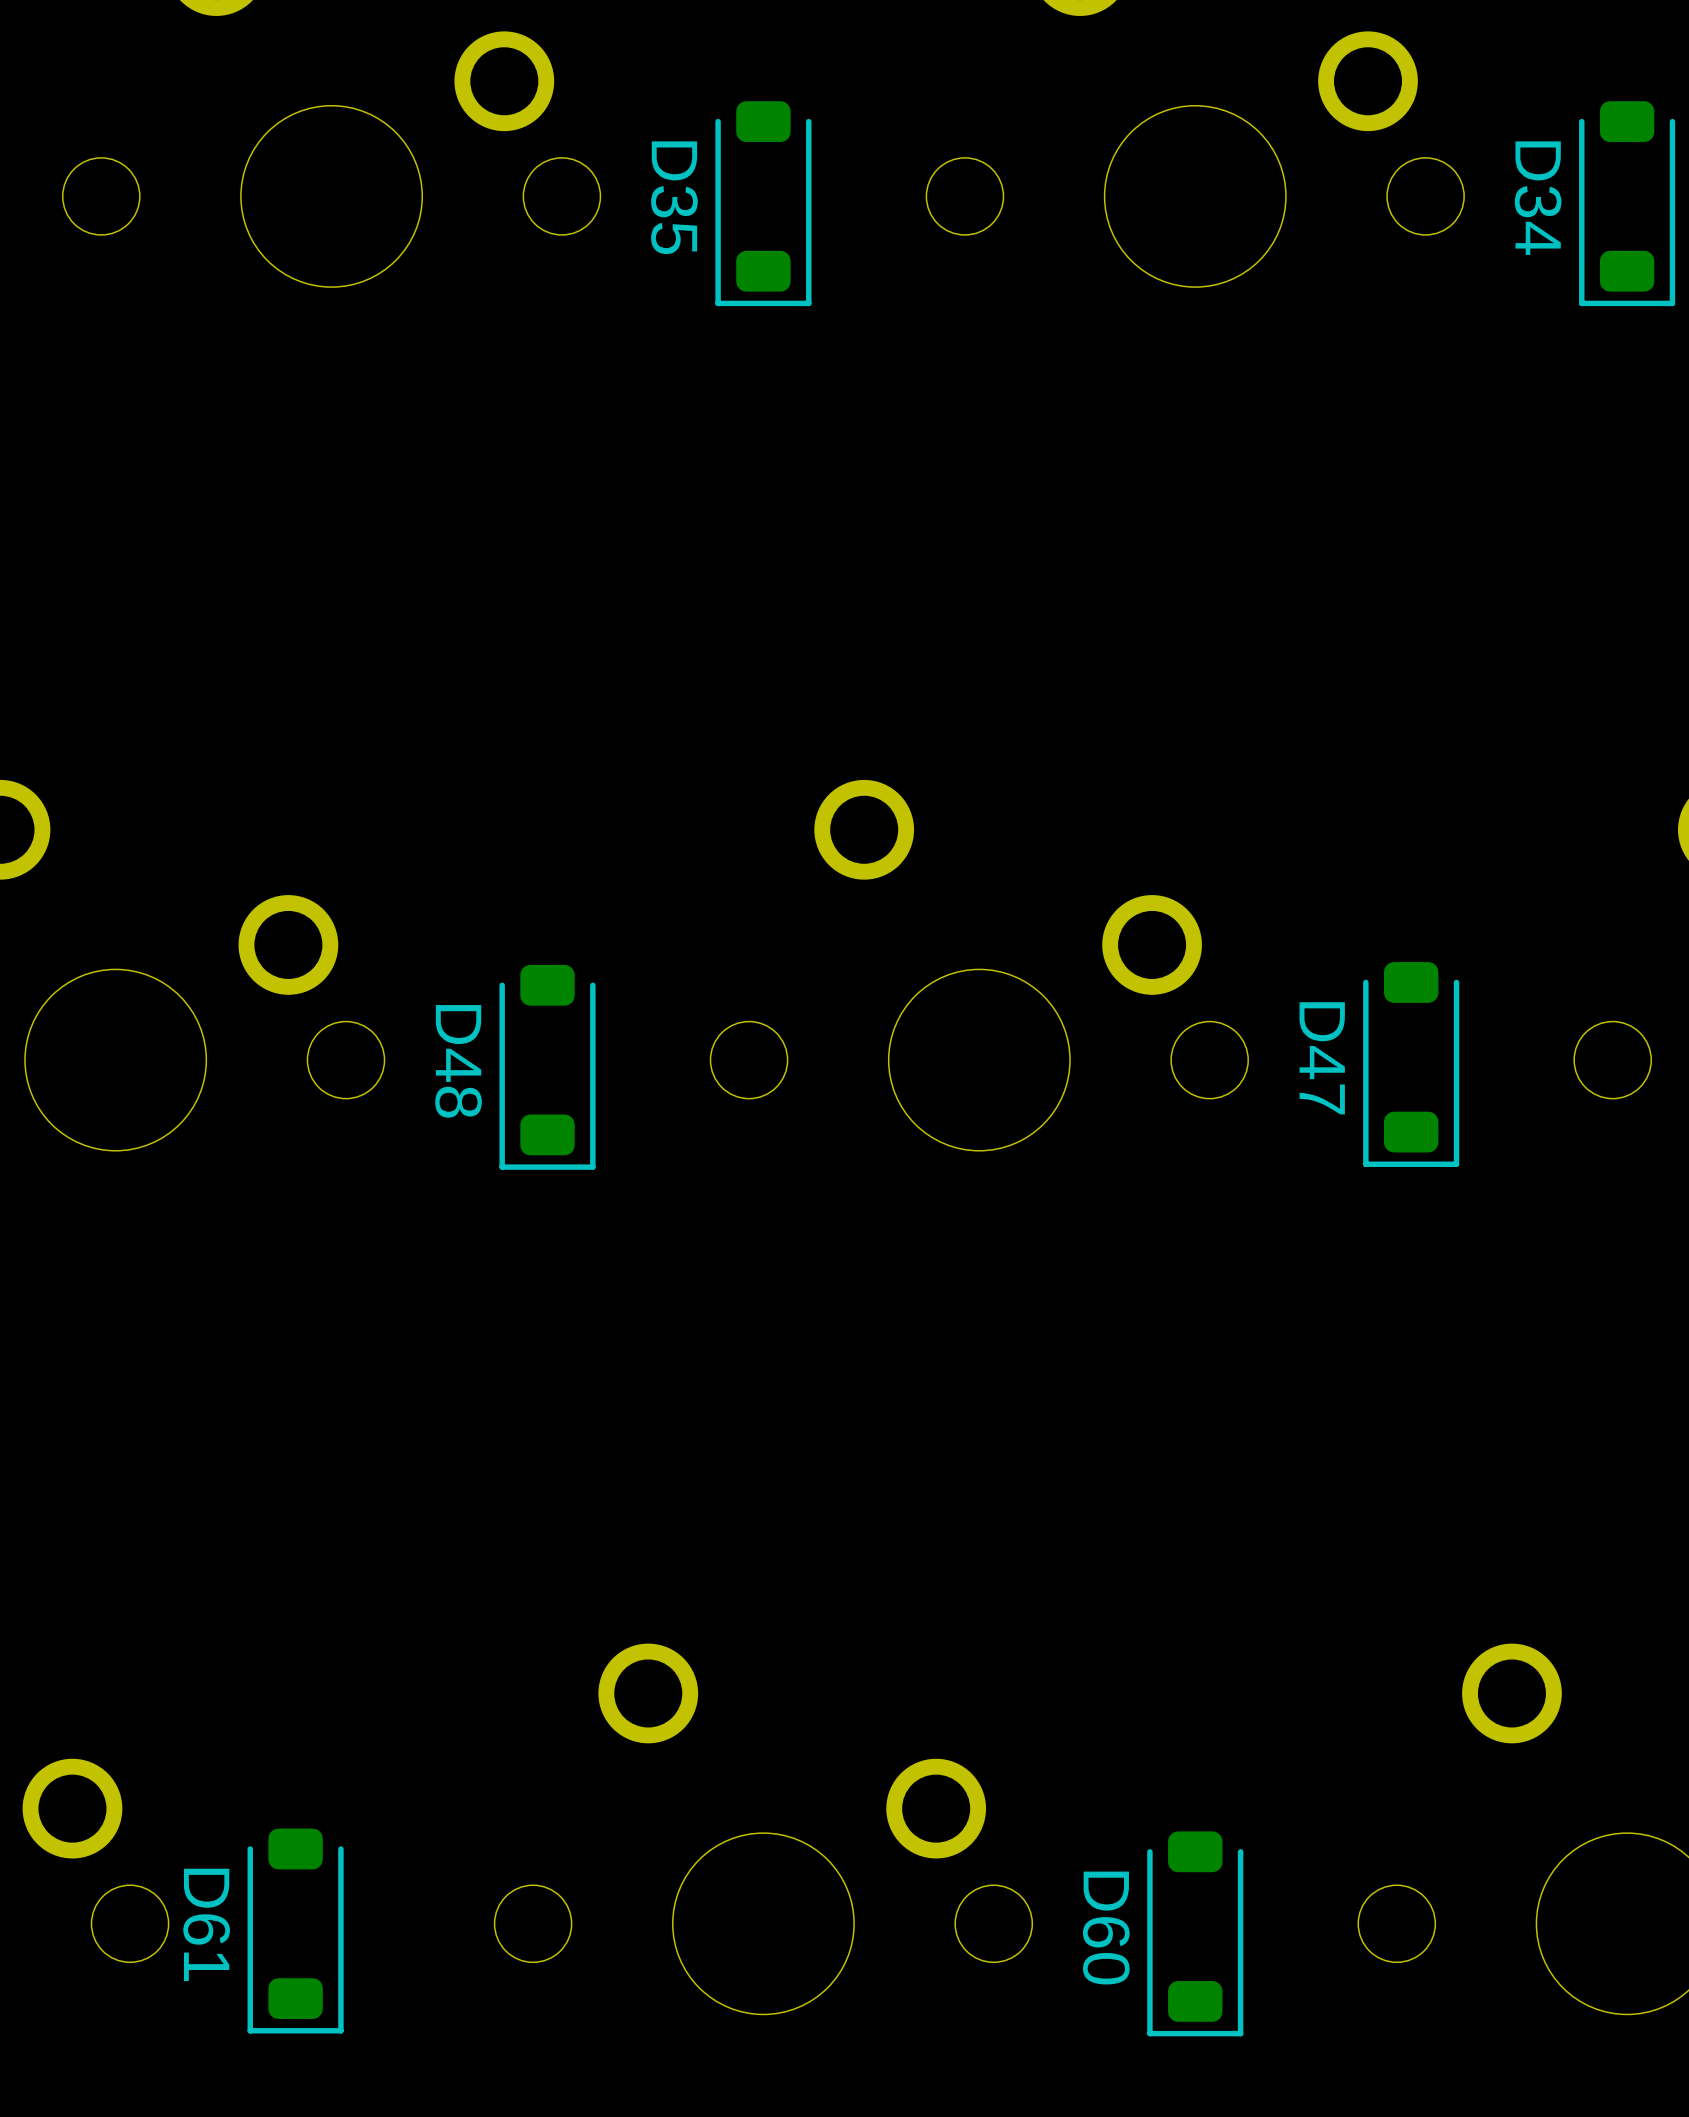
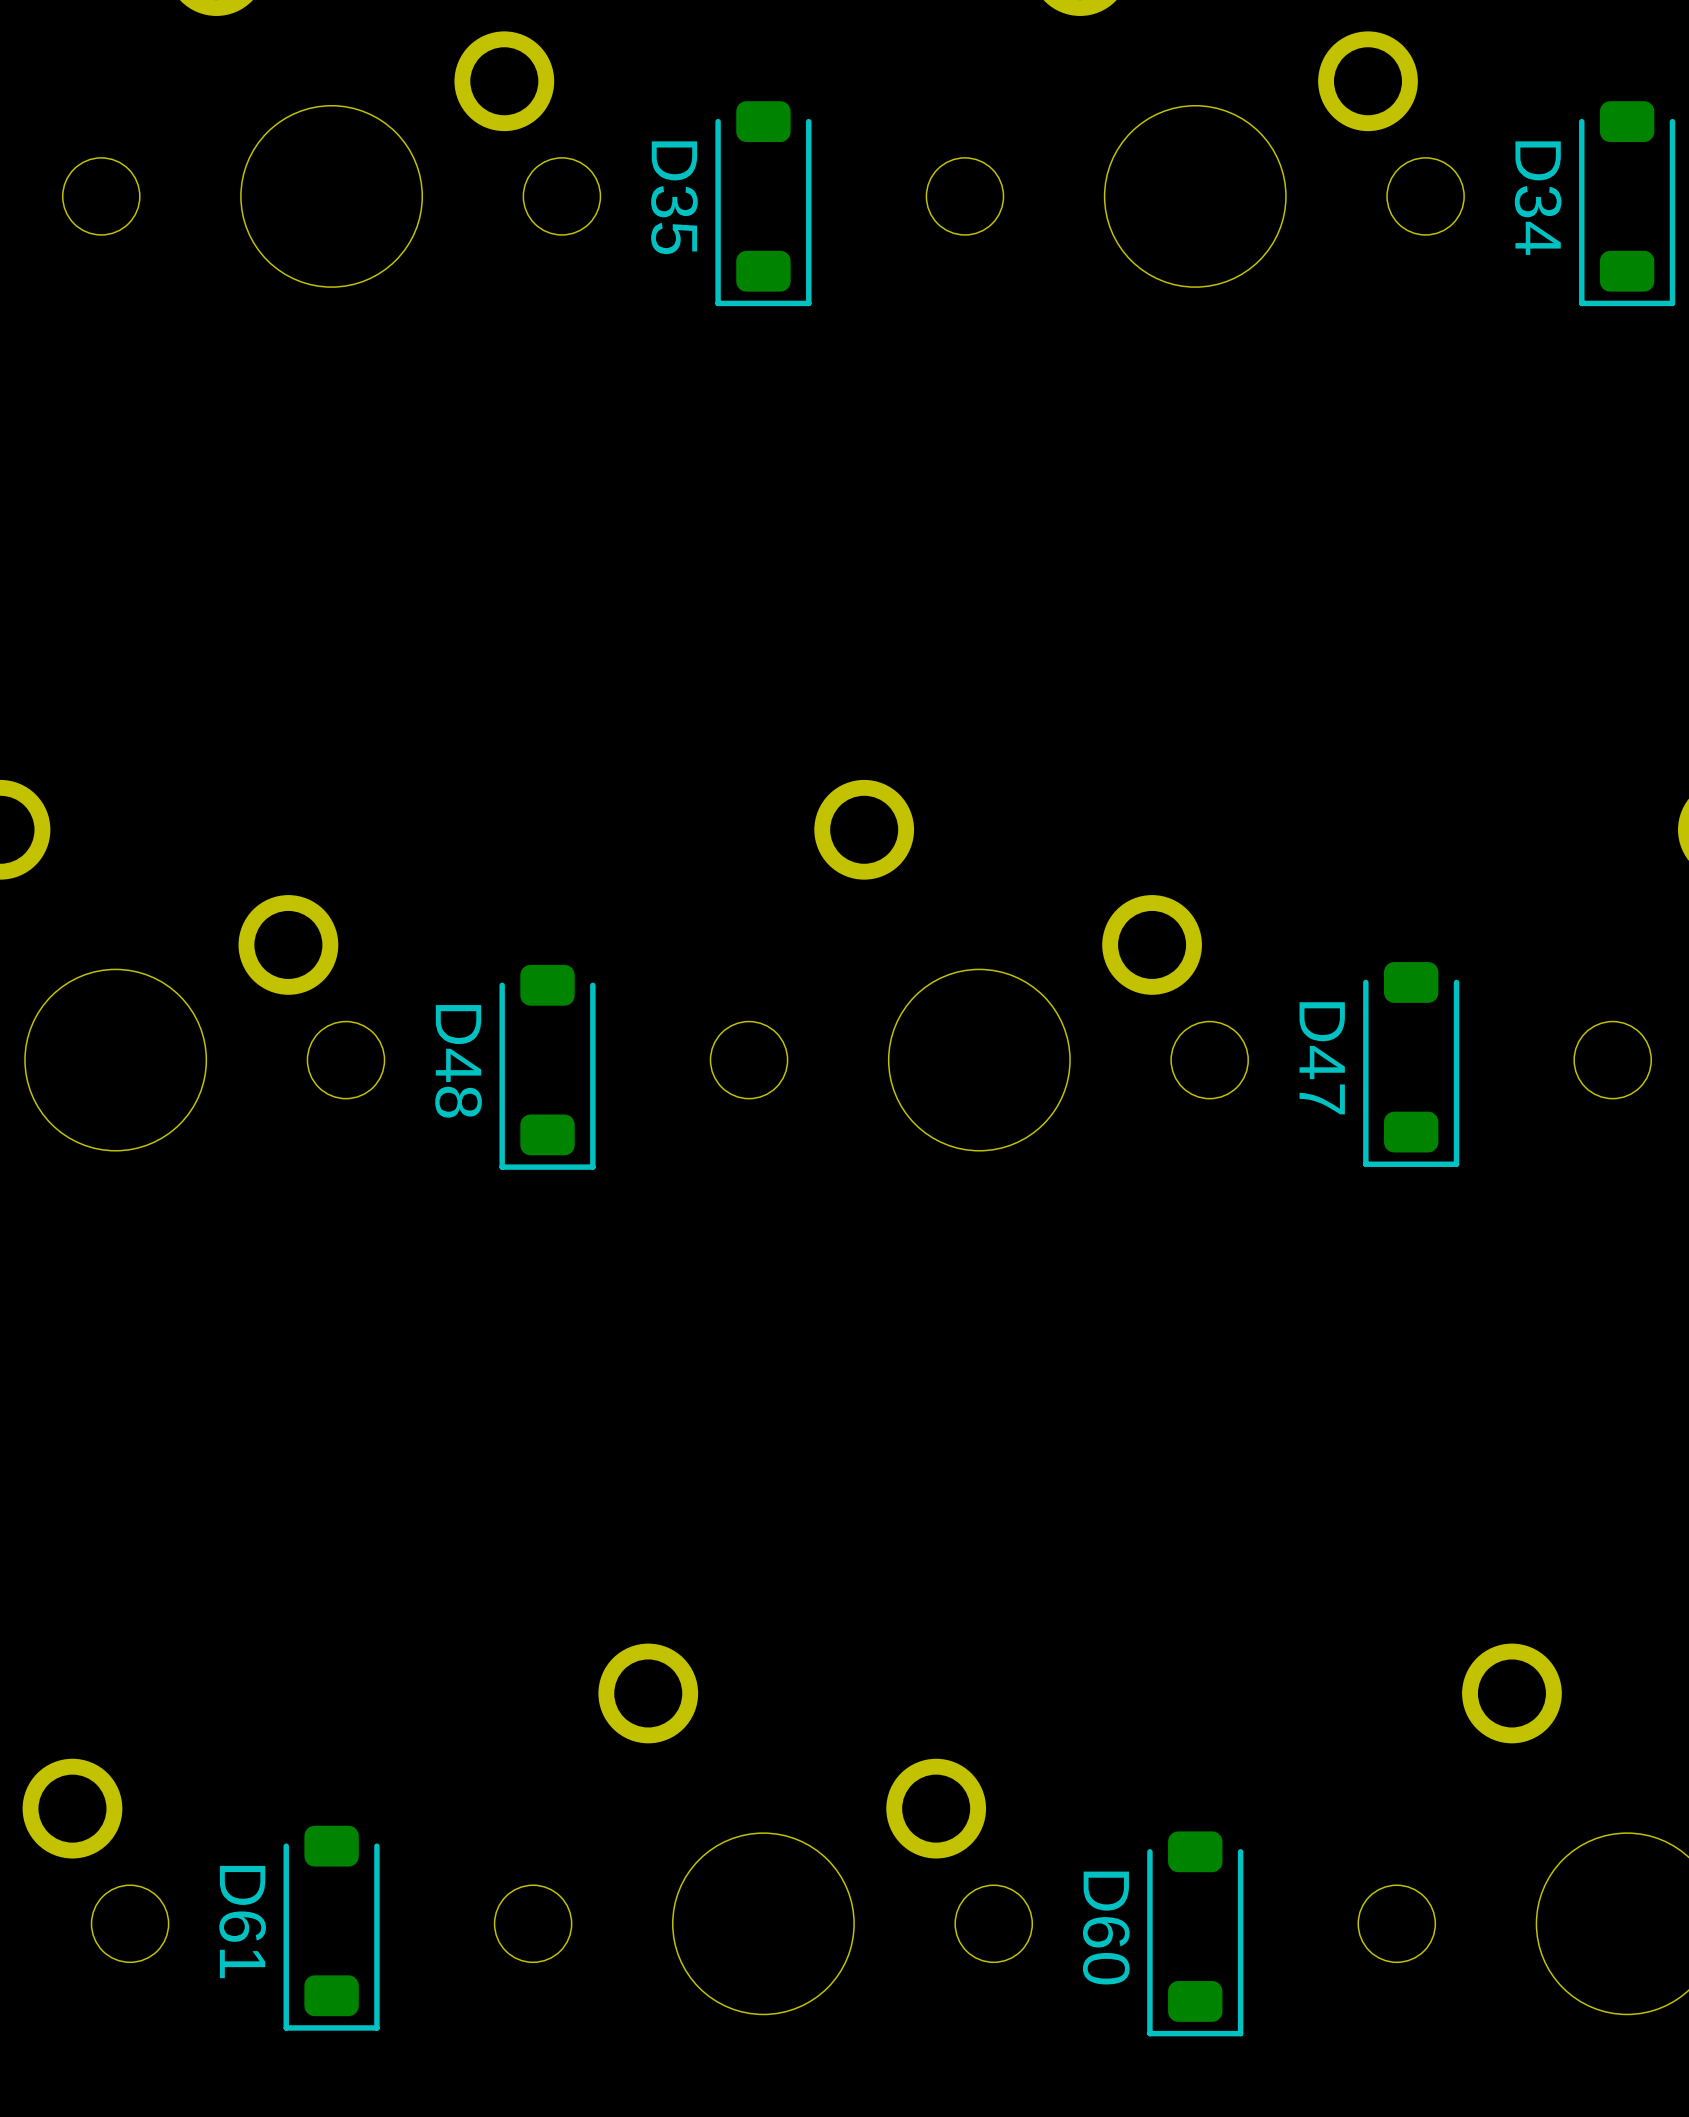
D61 position: (295, 1931) -> (331, 1928)

